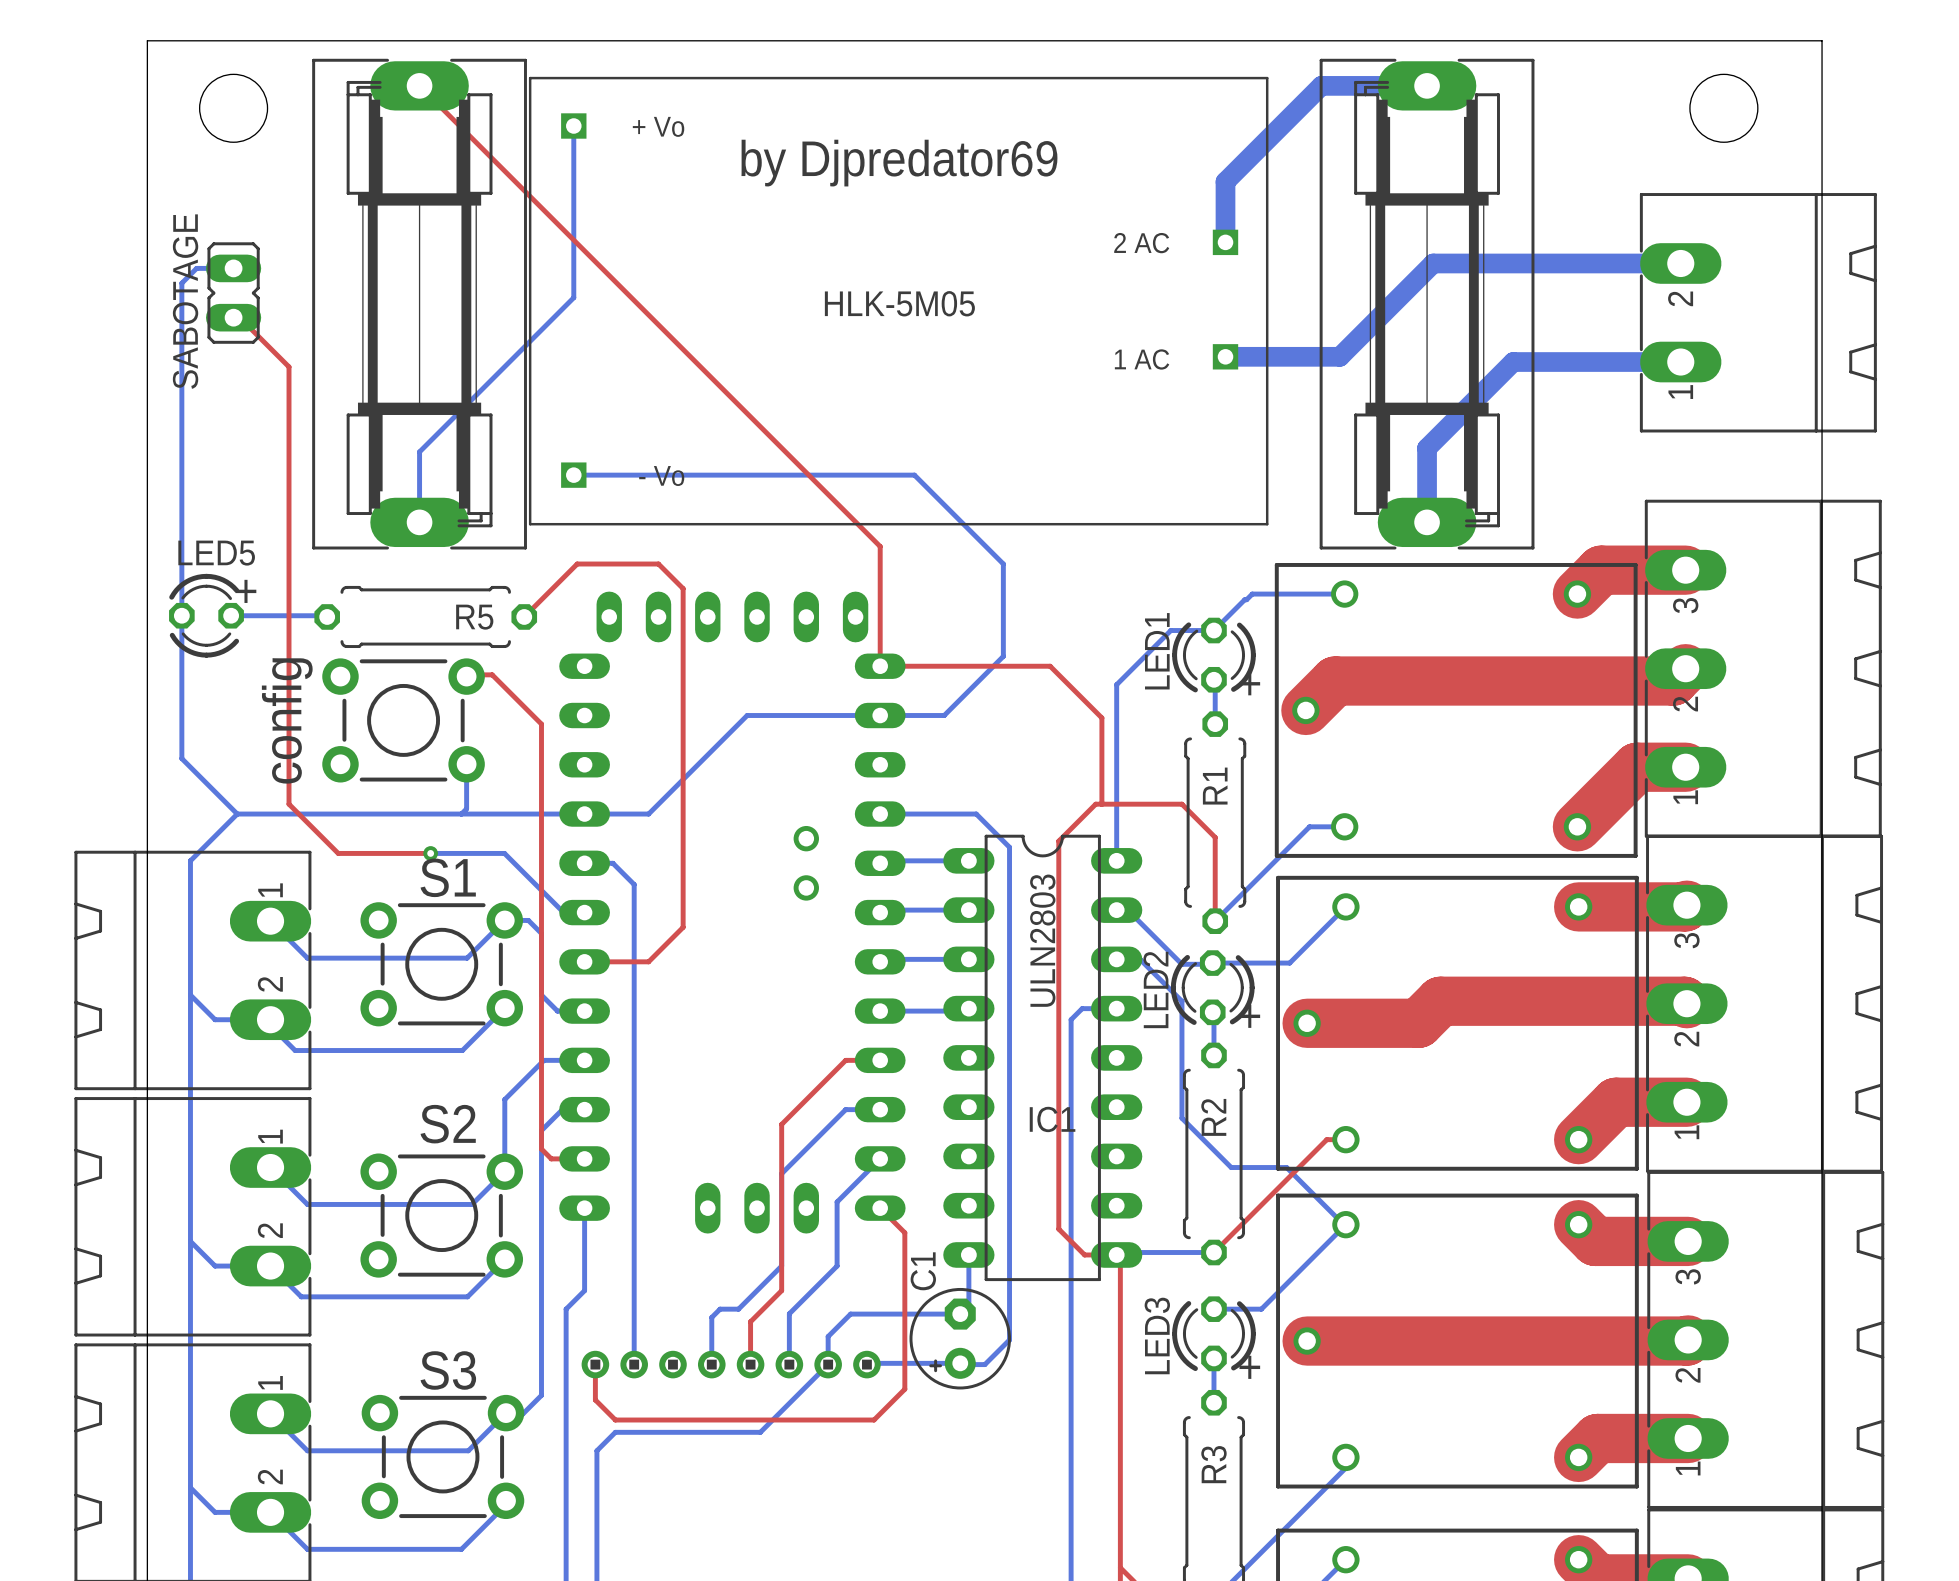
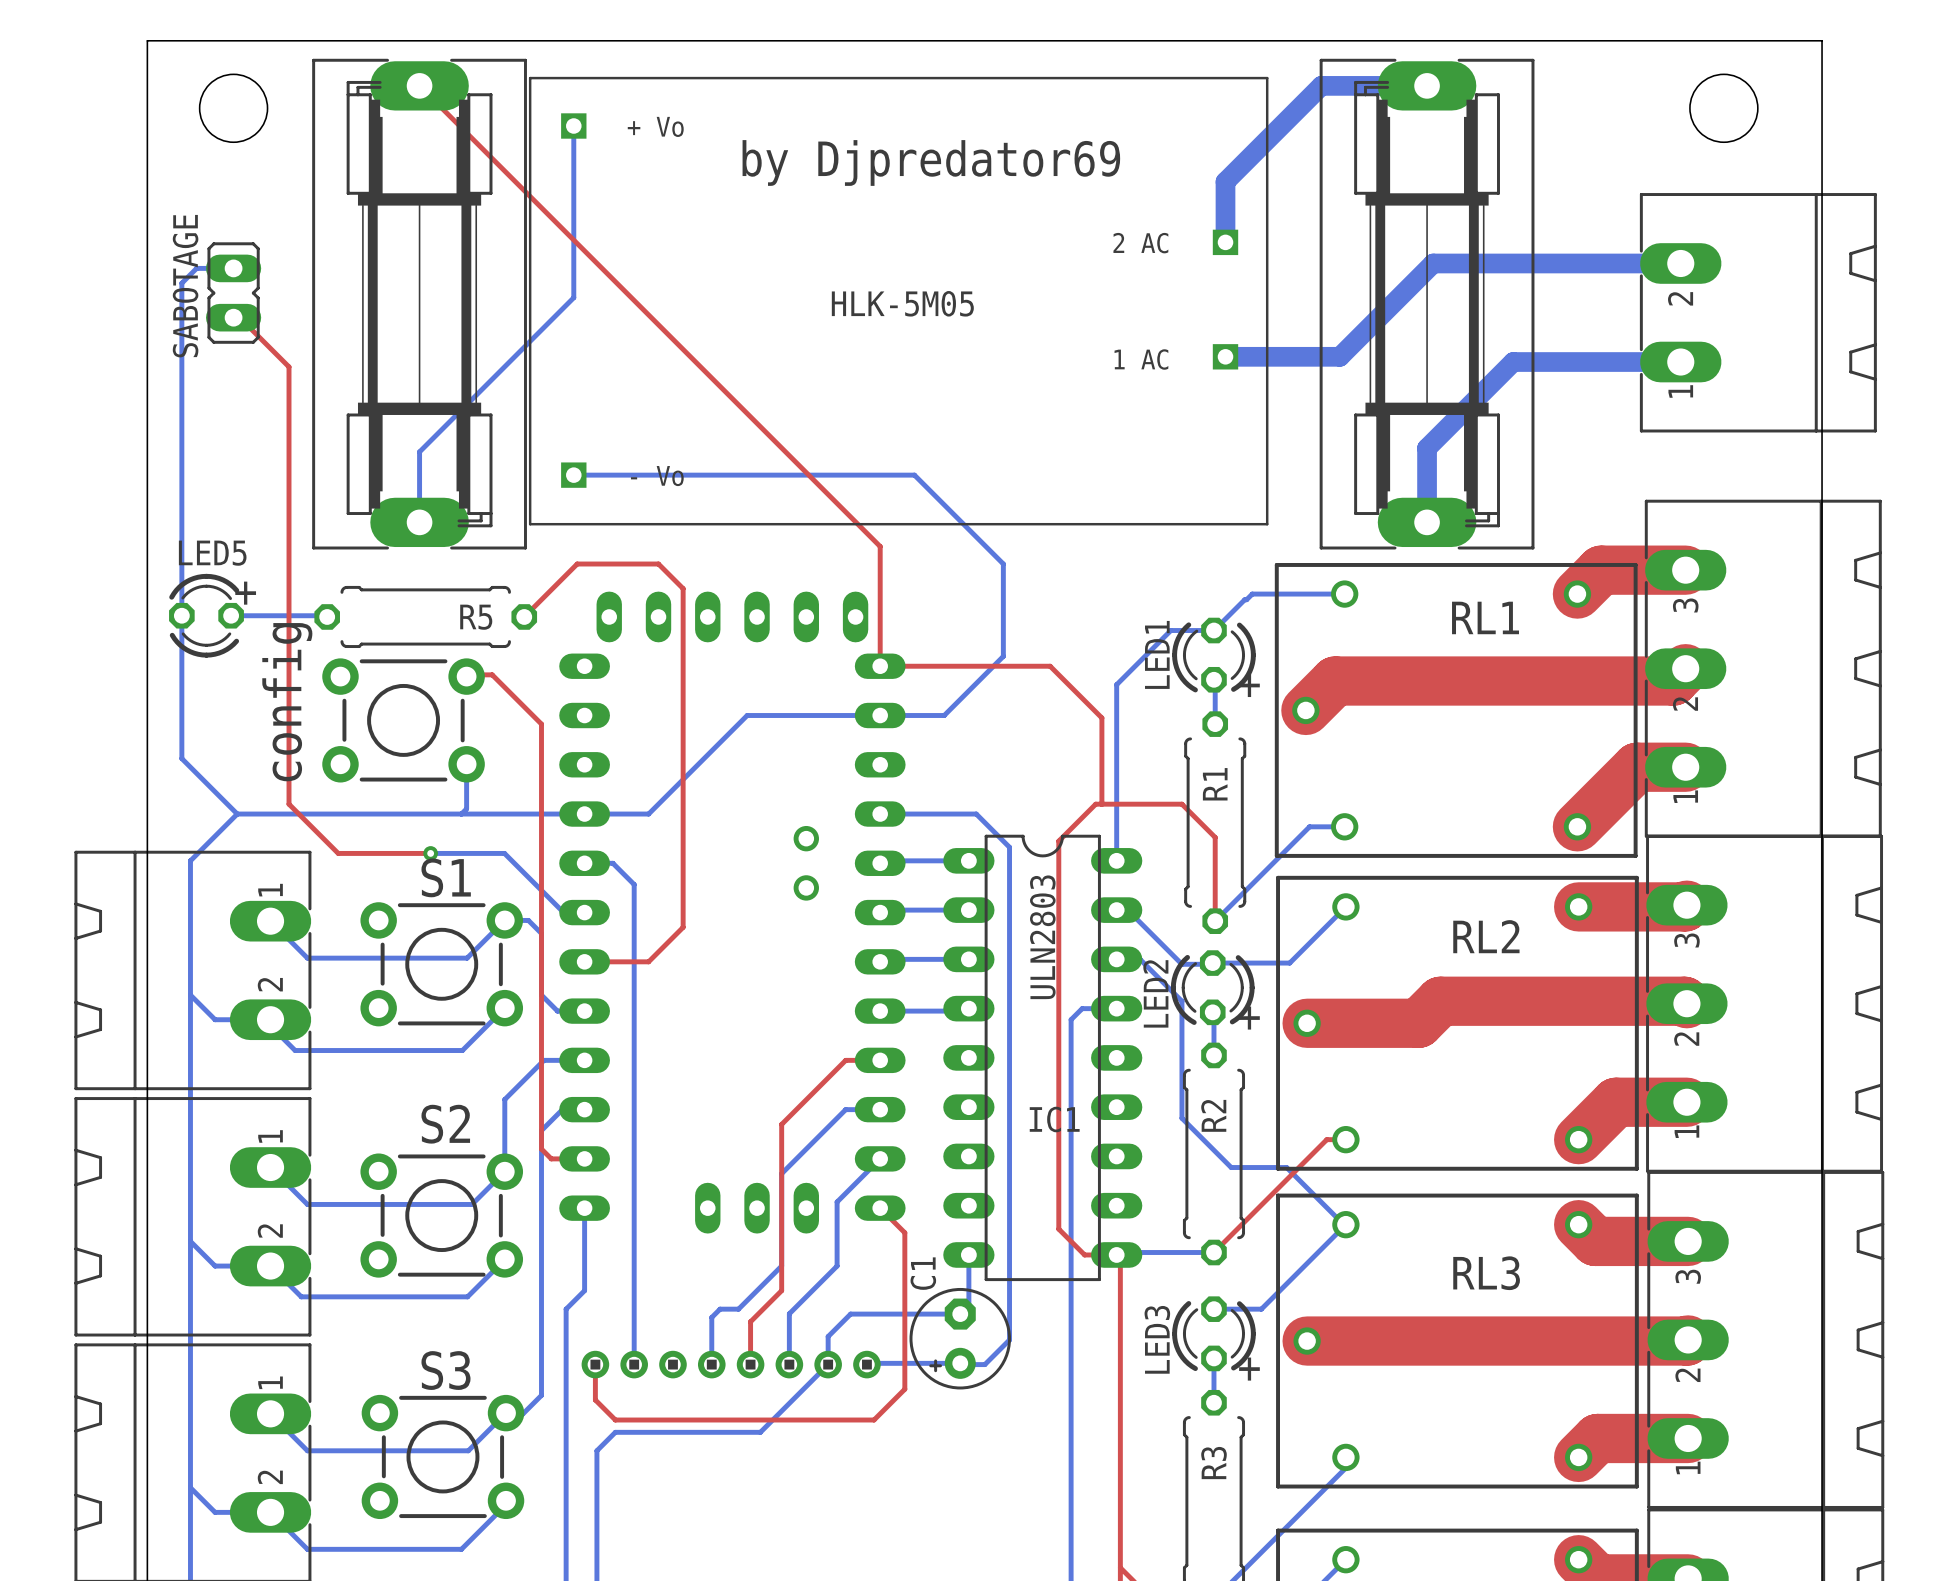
RL1 name: none -> RL1 (1485, 617)
RL2 name: none -> RL2 (1486, 936)
RL3 name: none -> RL3 (1486, 1273)

